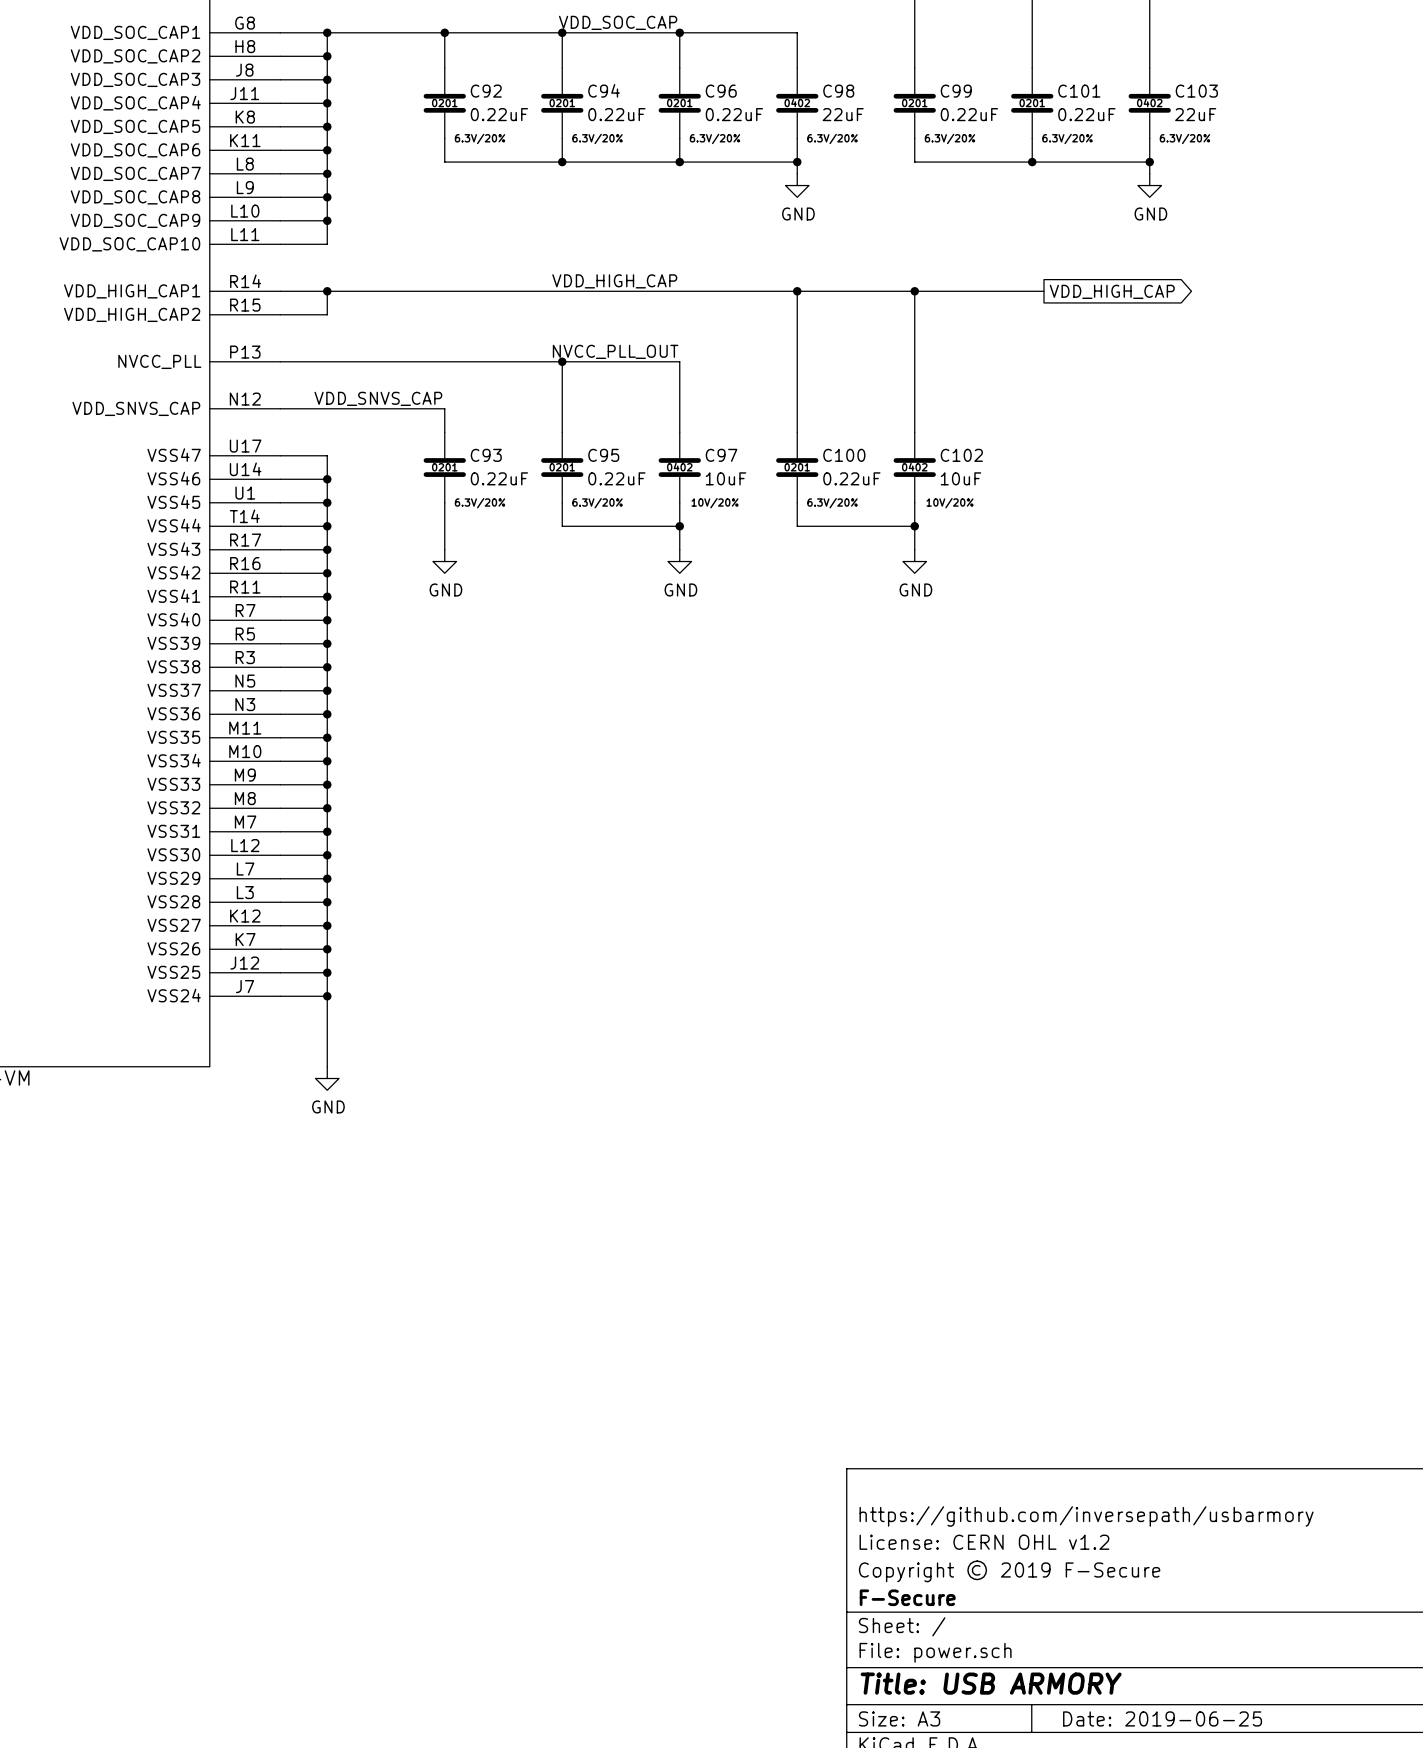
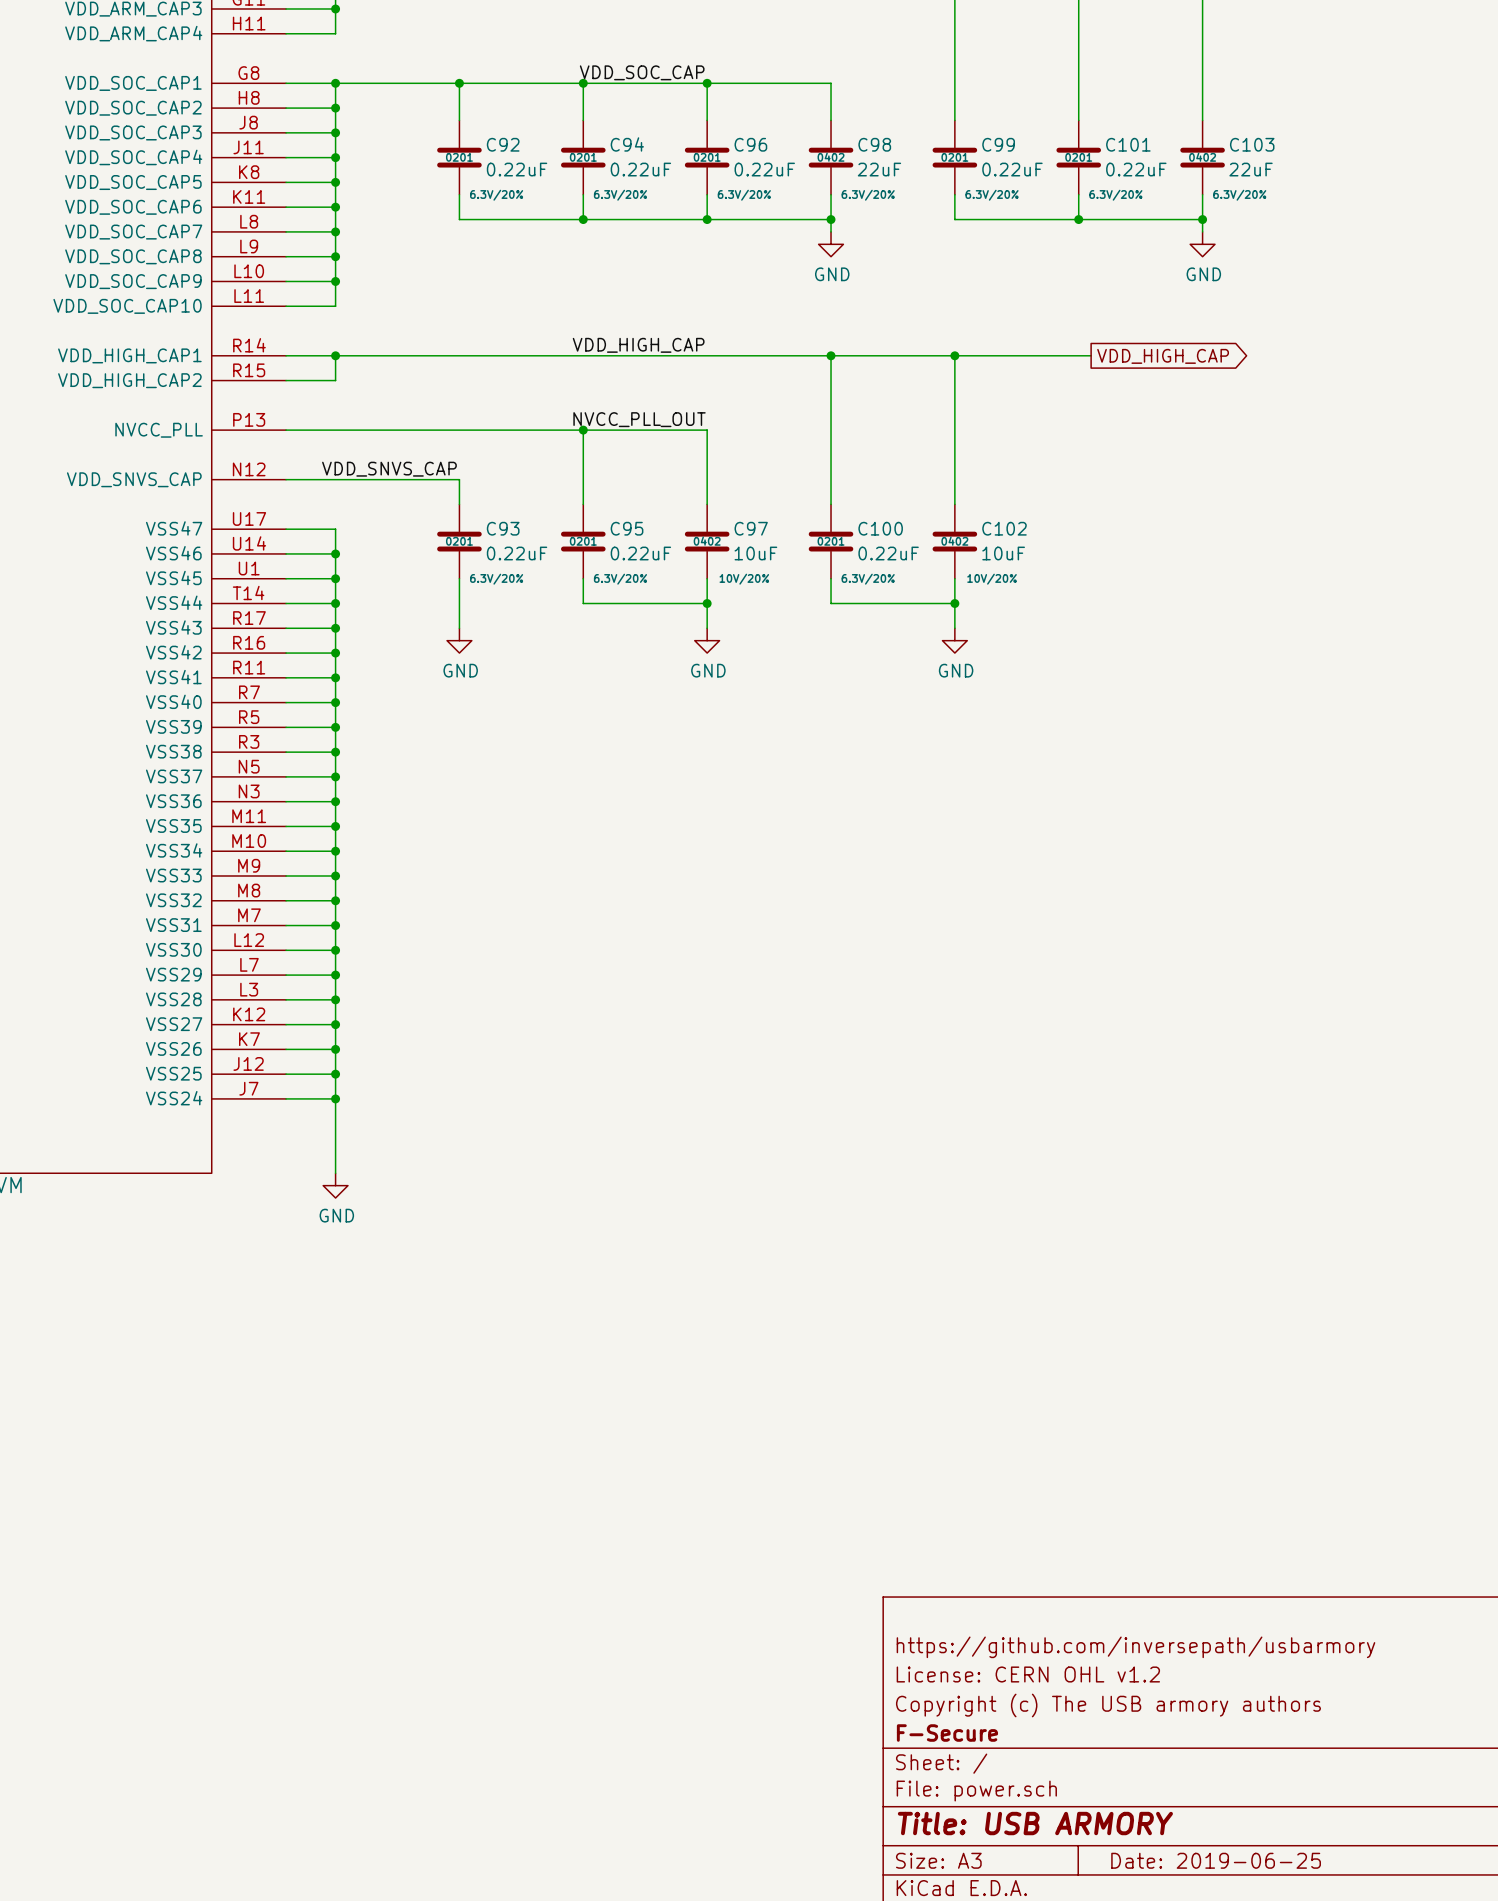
title block: Copyright © 2019 F-Secure (1009, 1571) -> Copyright (c) The USB armory authors (1108, 1705)

